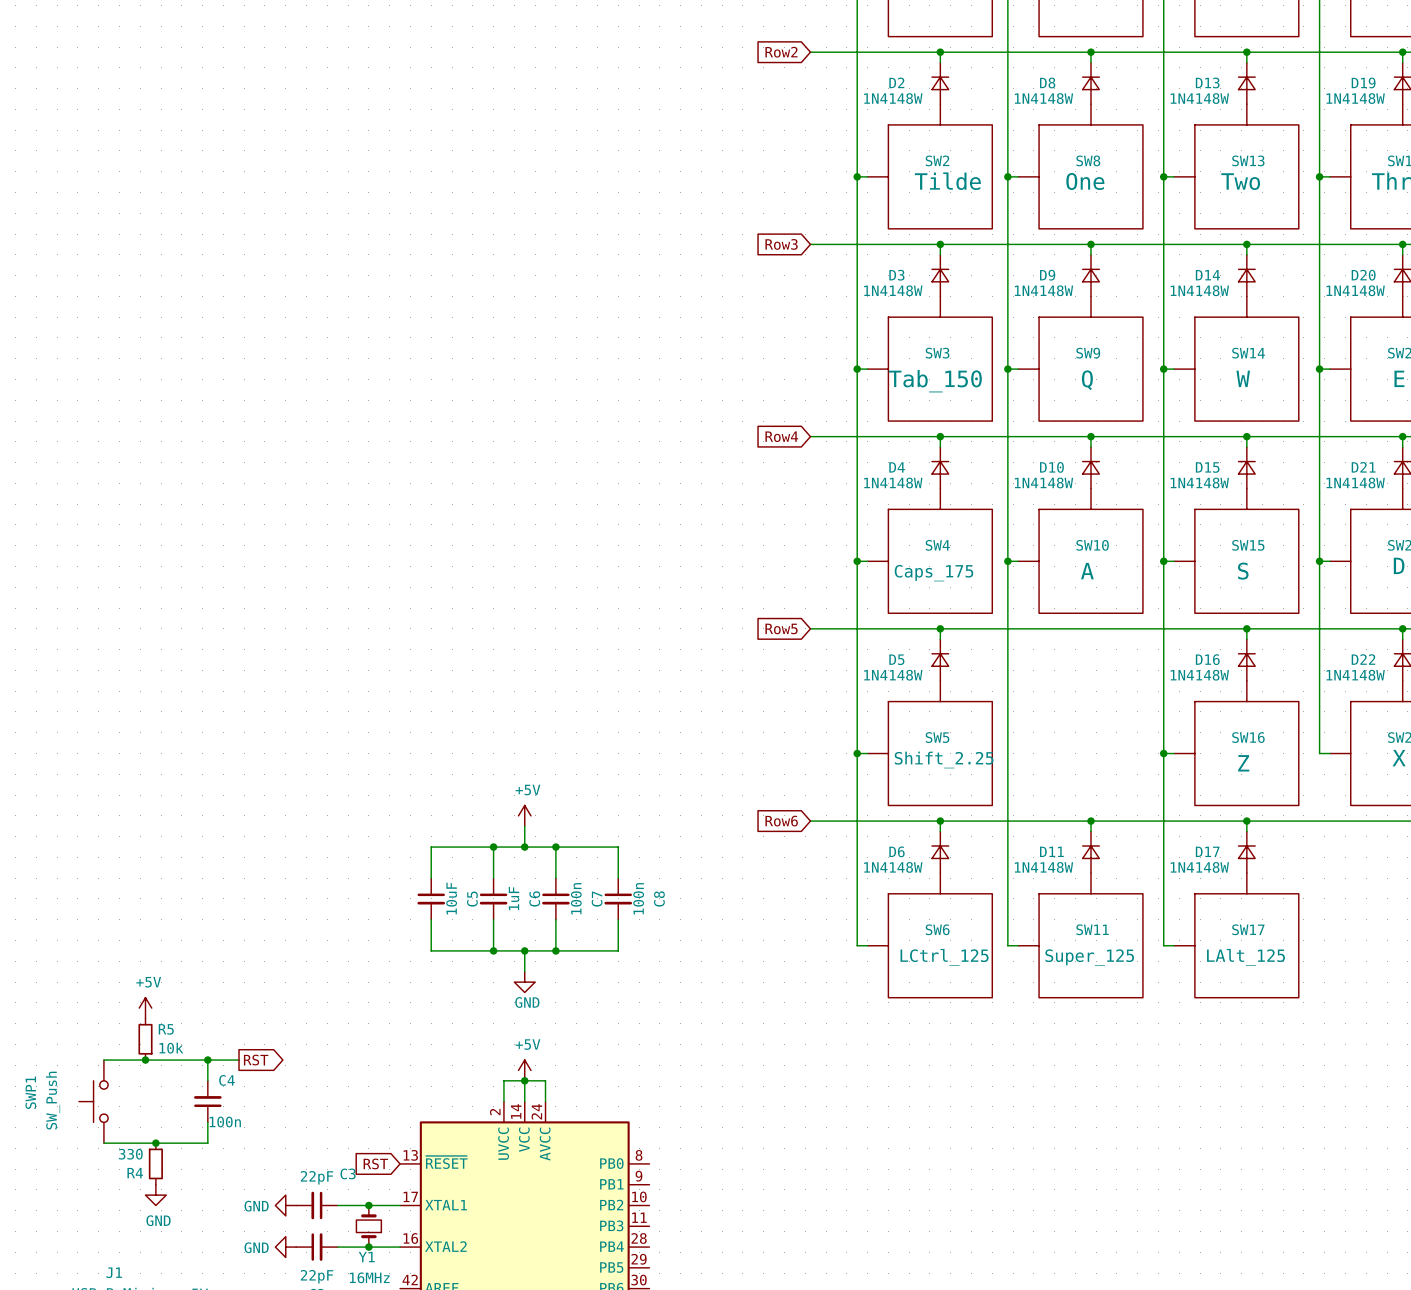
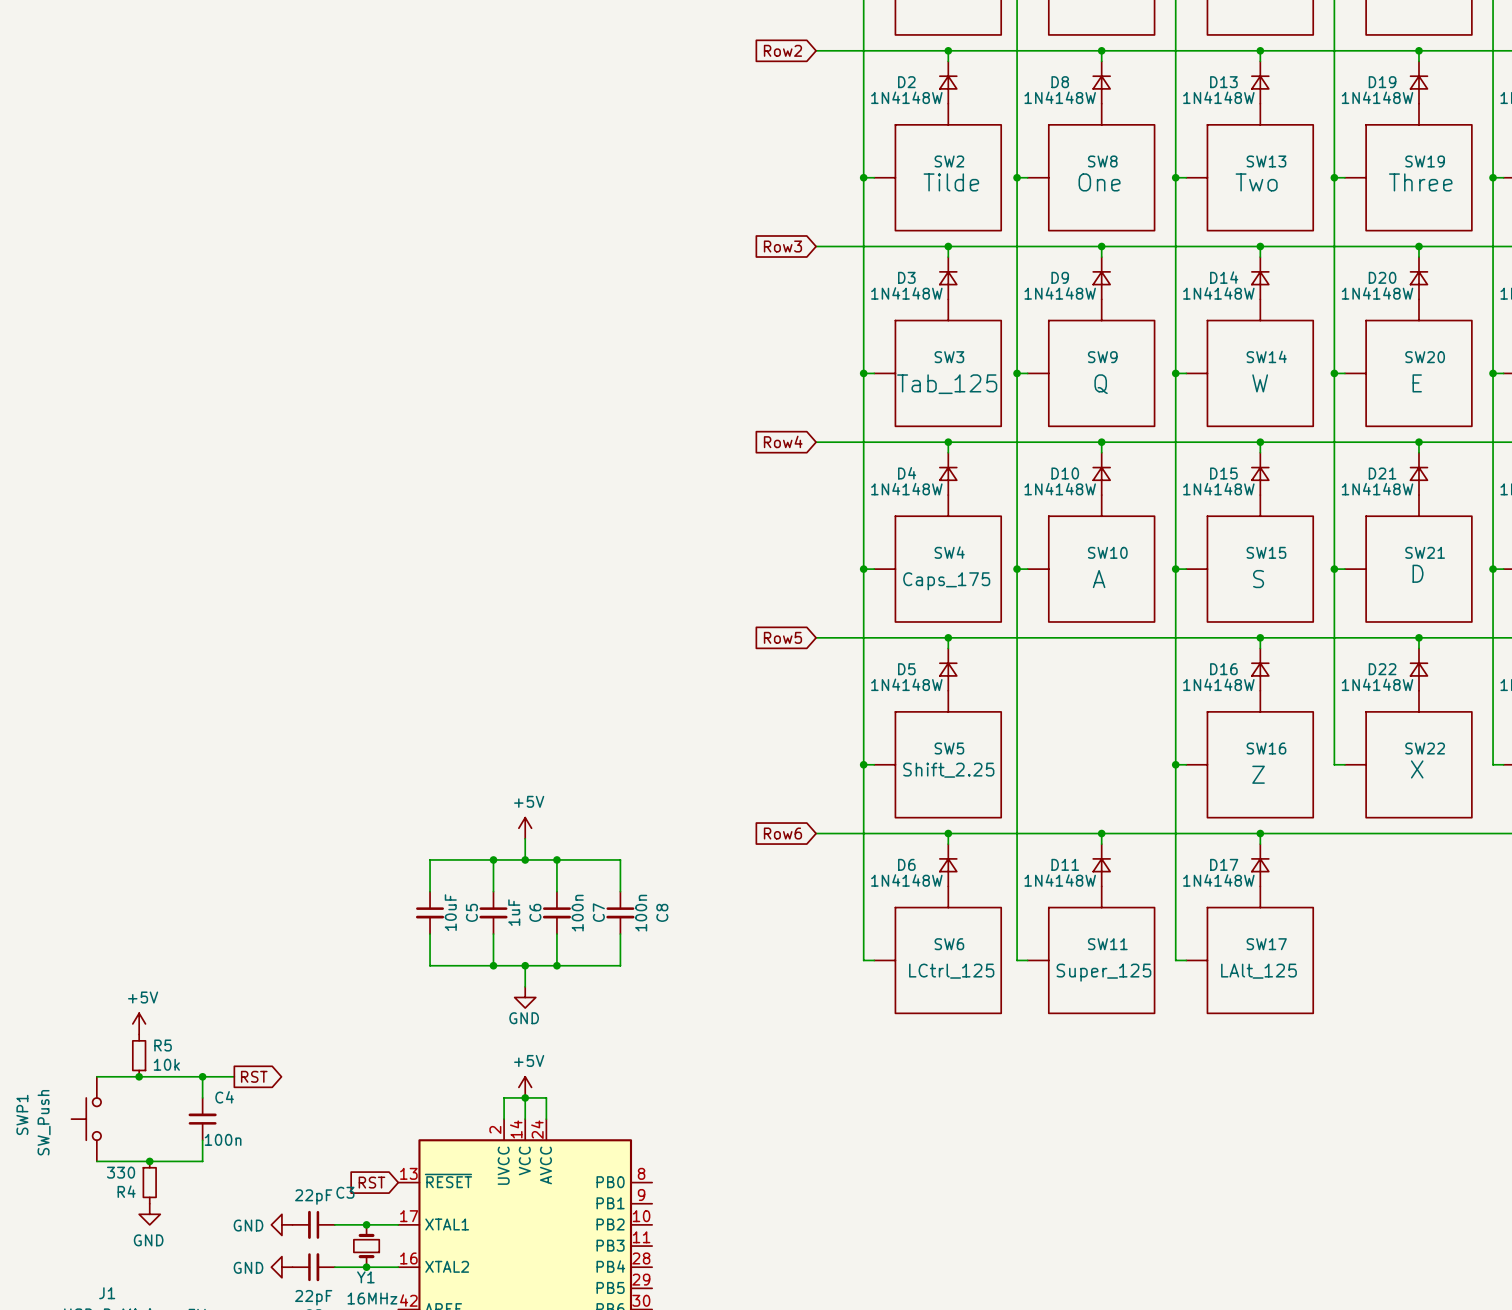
SW3 value: Tab_150 (935, 381) -> Tab_125 (947, 384)

